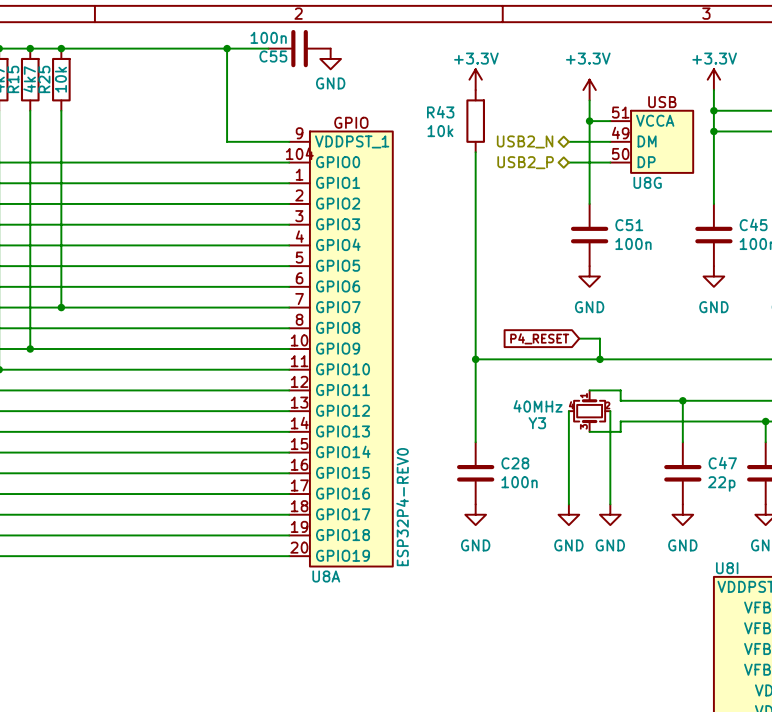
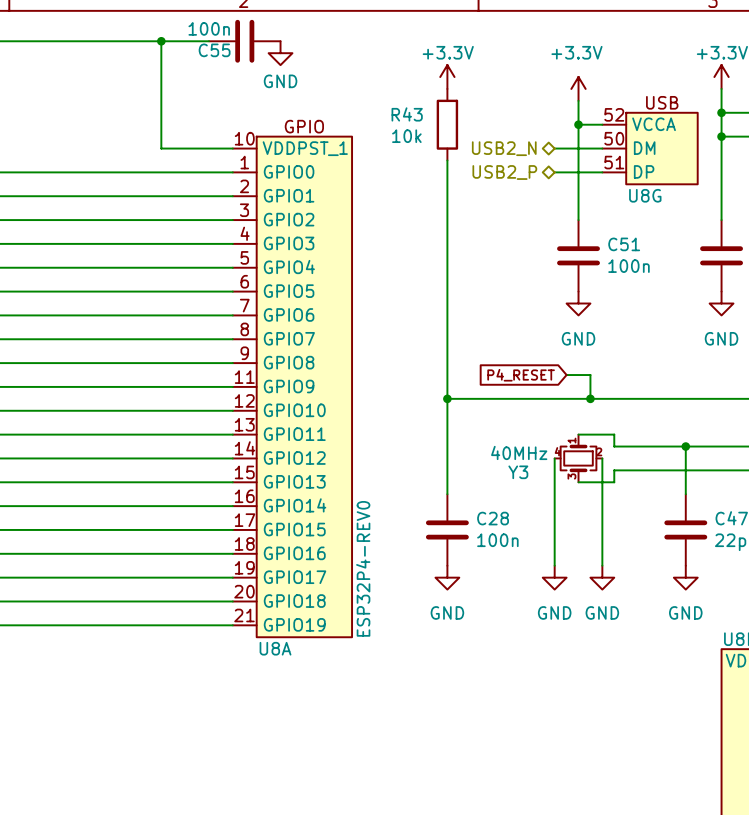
U8G pin number: 51 (620, 112) -> 52 (614, 114)
U8A symbol: [289, 131, 393, 567] -> [232, 136, 353, 638]
U8G pin number: 49 (620, 133) -> 50 (614, 138)
U8G pin number: 50 (620, 154) -> 51 (614, 162)

